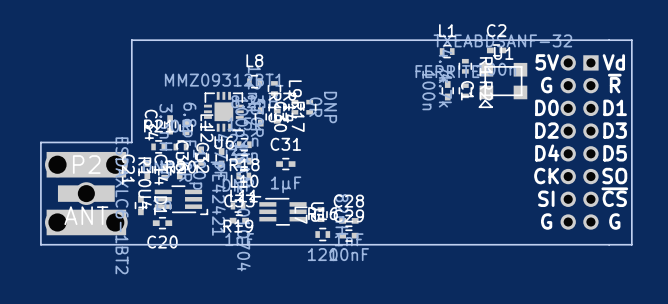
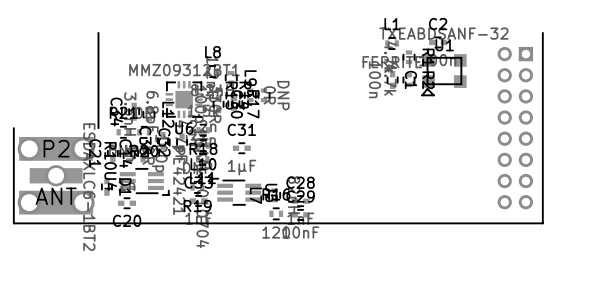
board edge: (131, 40) (631, 40) (631, 244) (609, 244) -> (542, 32) (542, 223)
text: 5V (547, 62) -> none
text: Vd (613, 62) -> none
text: ~{R} (614, 83) -> none
text: G (546, 85) -> none
text: D0 (546, 107) -> none
text: D1 (615, 107) -> none
text: D2 (546, 130) -> none
text: D3 (615, 130) -> none
board edge: (131, 142) (40, 142) -> none
text: D4 (547, 152) -> none
text: D5 (615, 153) -> none
text: CK (546, 176) -> none
text: SO (614, 176) -> none
text: ~{CS} (614, 197) -> none
text: SI (546, 198) -> none
text: G (546, 221) -> none
text: G (614, 221) -> none

